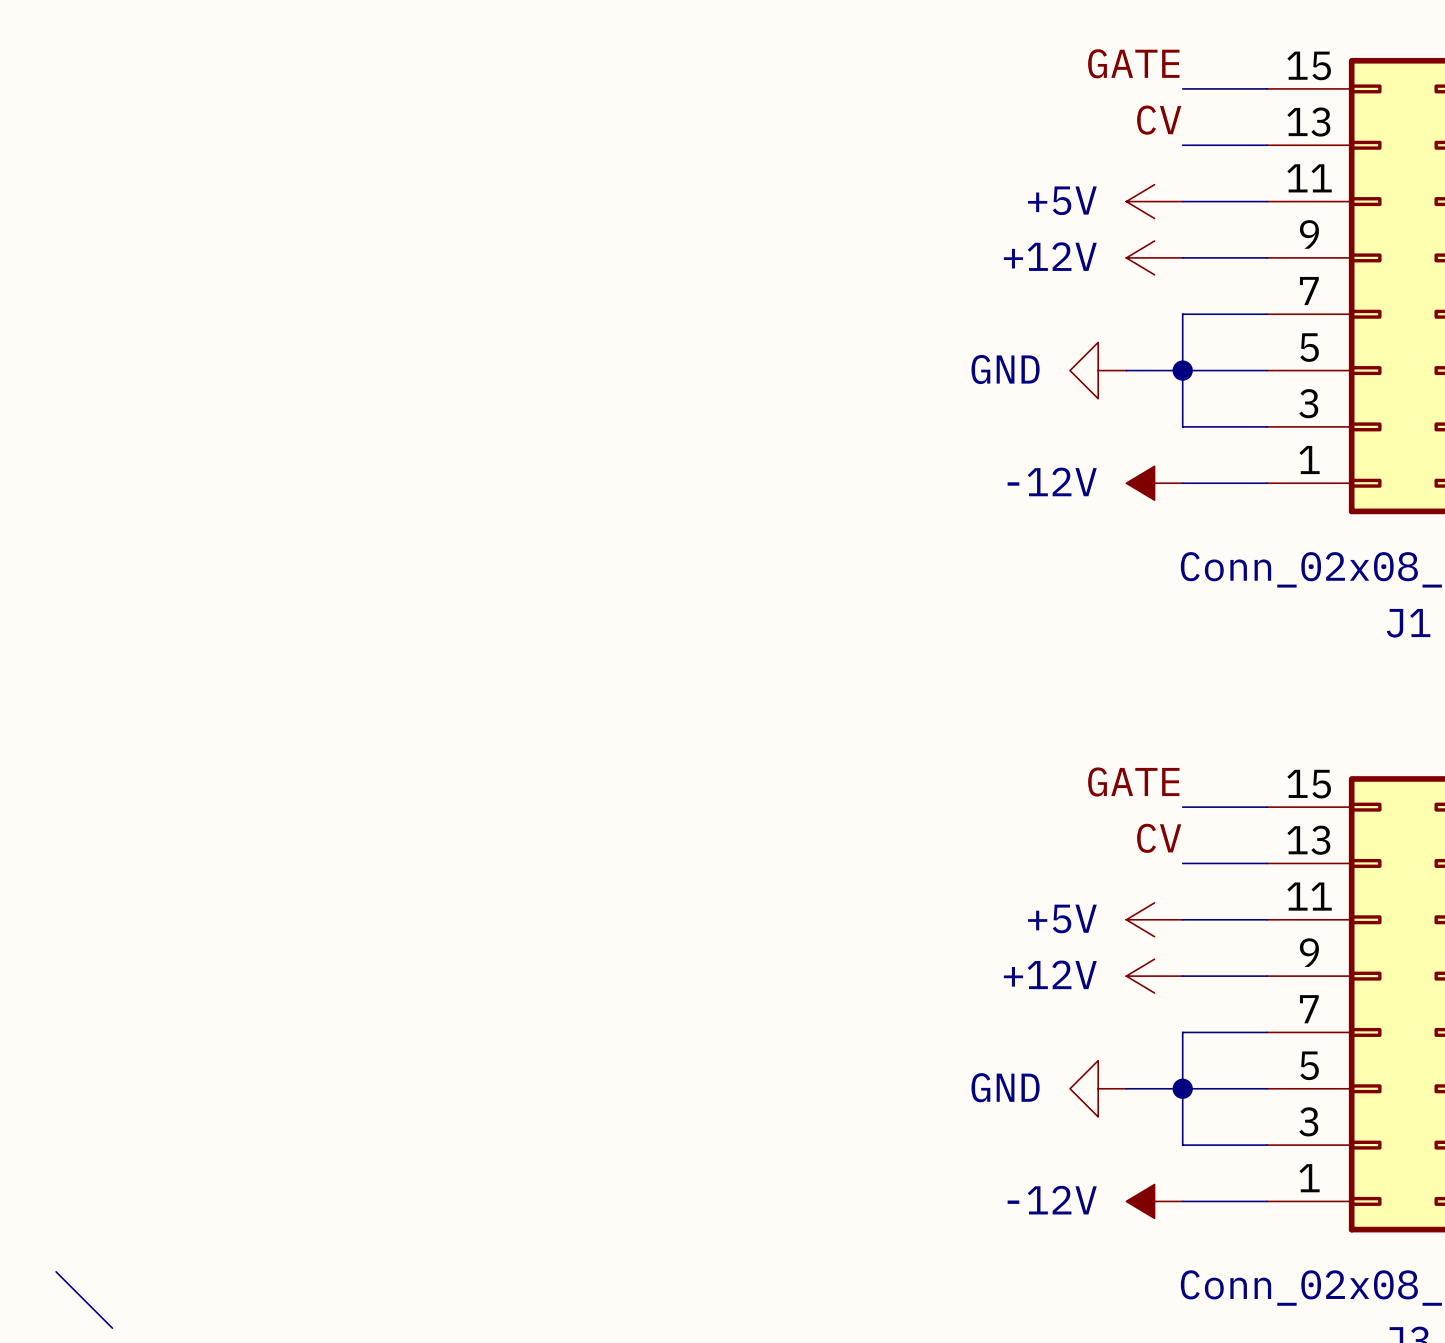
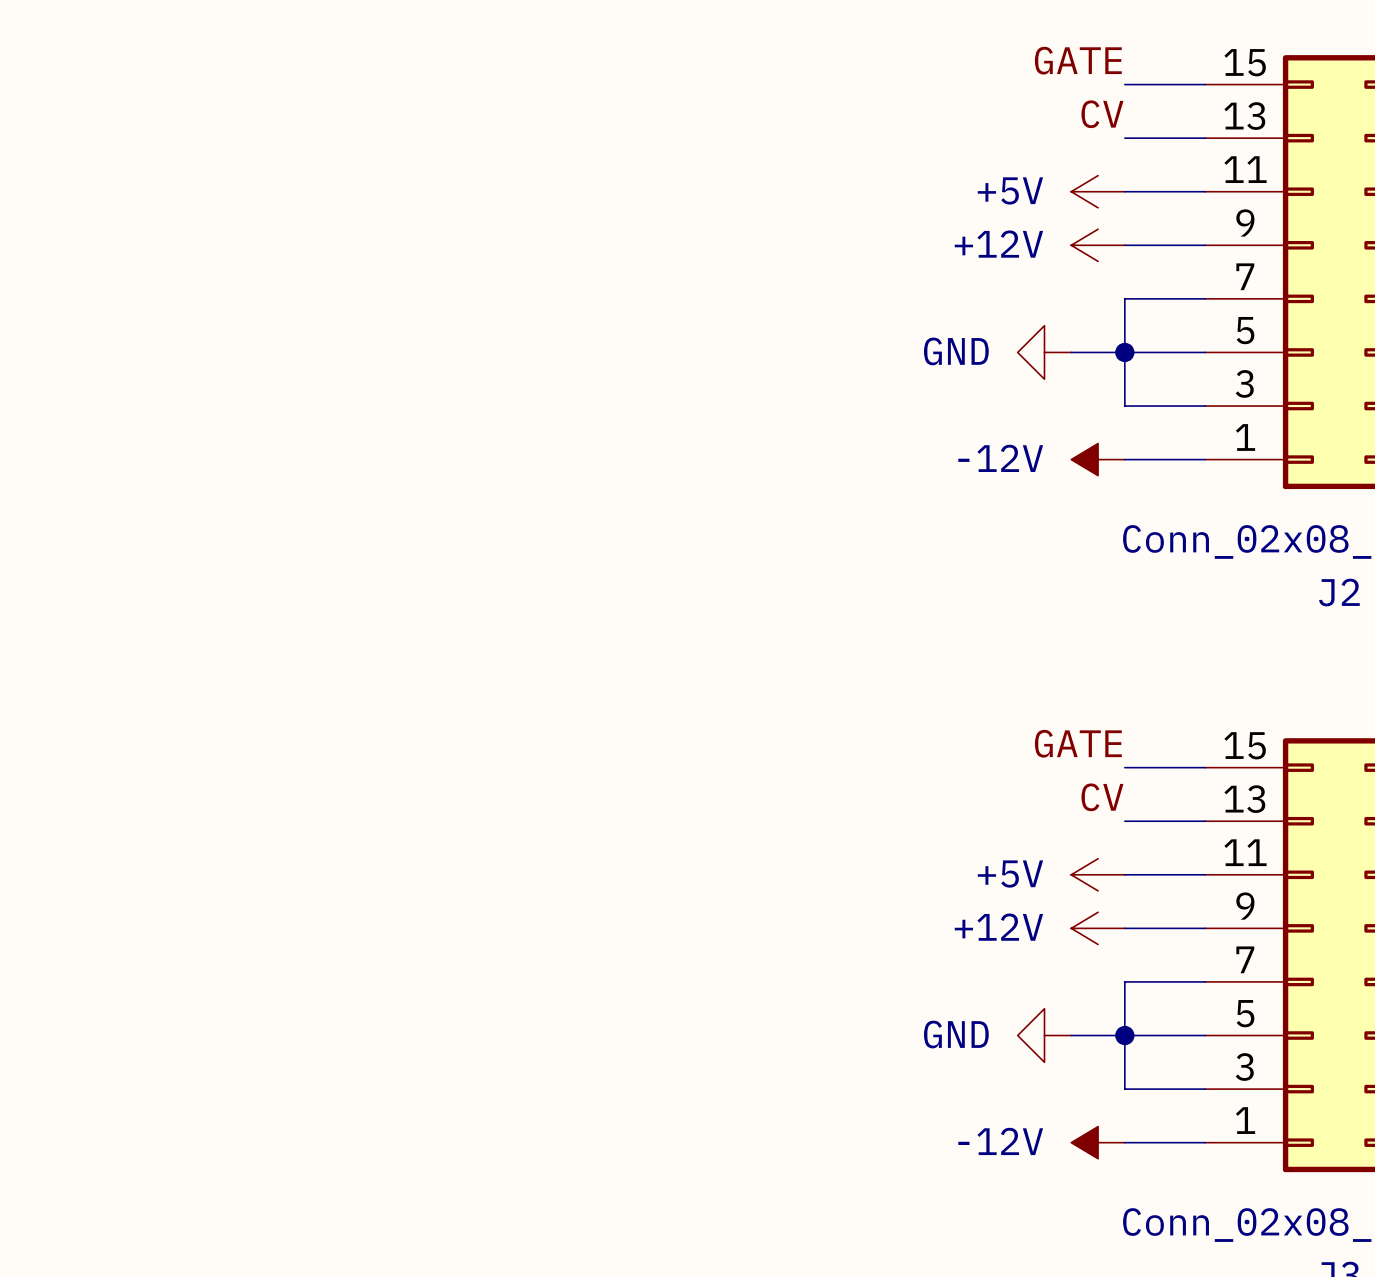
J1 name: J1 (1408, 623) -> J2 (1339, 592)
wire: (56, 1271) (112, 1328) -> none

